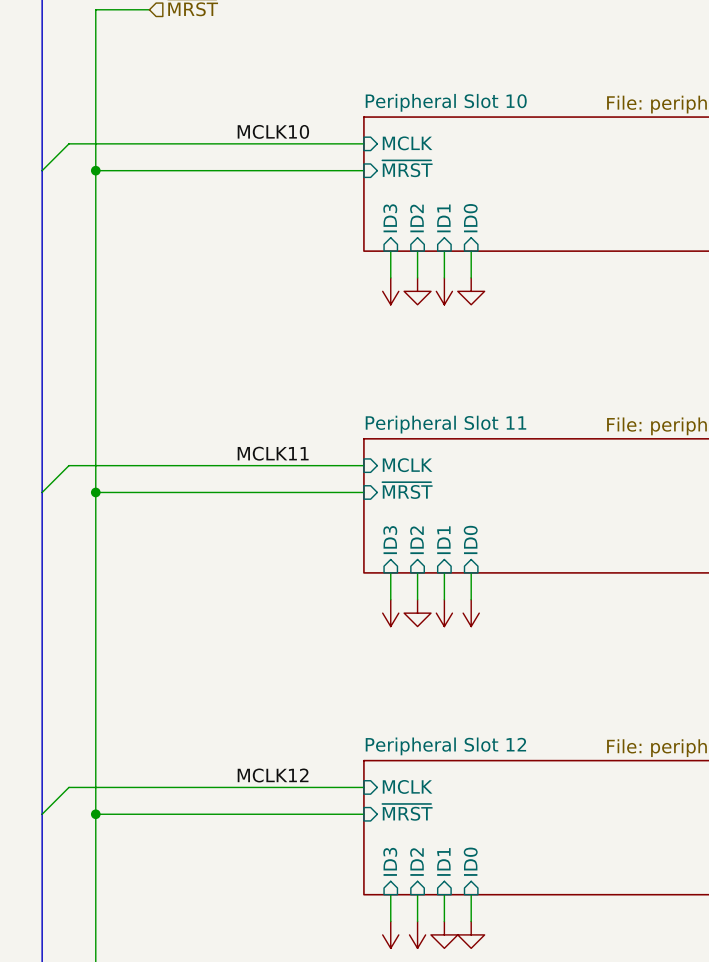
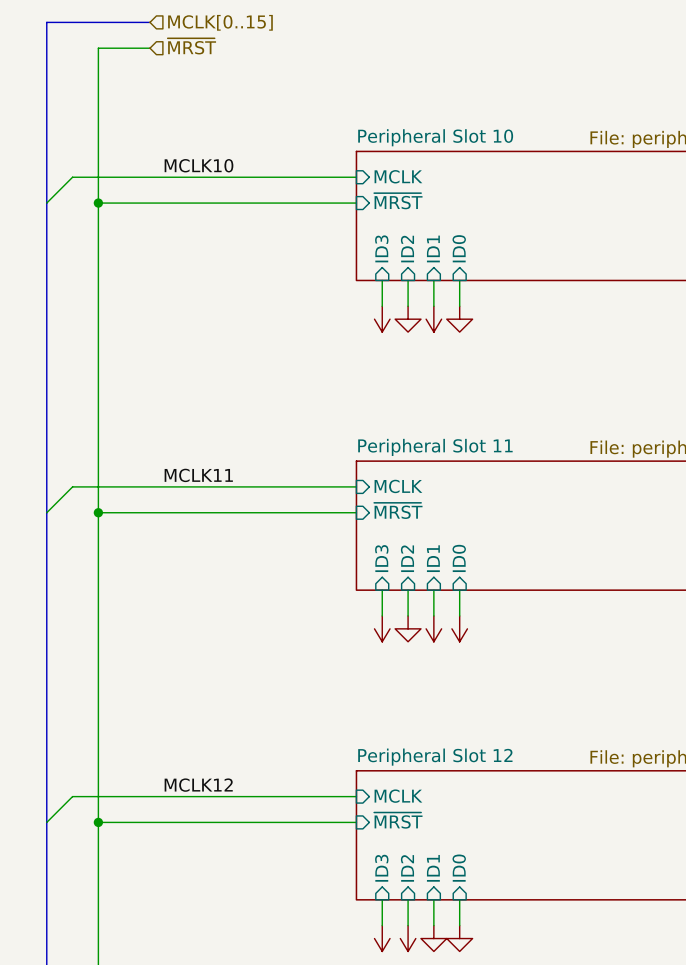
label position: MCLK10 (273, 131) -> MCLK10 (198, 165)
label position: MCLK11 (273, 453) -> MCLK11 (198, 475)
label position: MCLK12 (273, 775) -> MCLK12 (198, 785)

